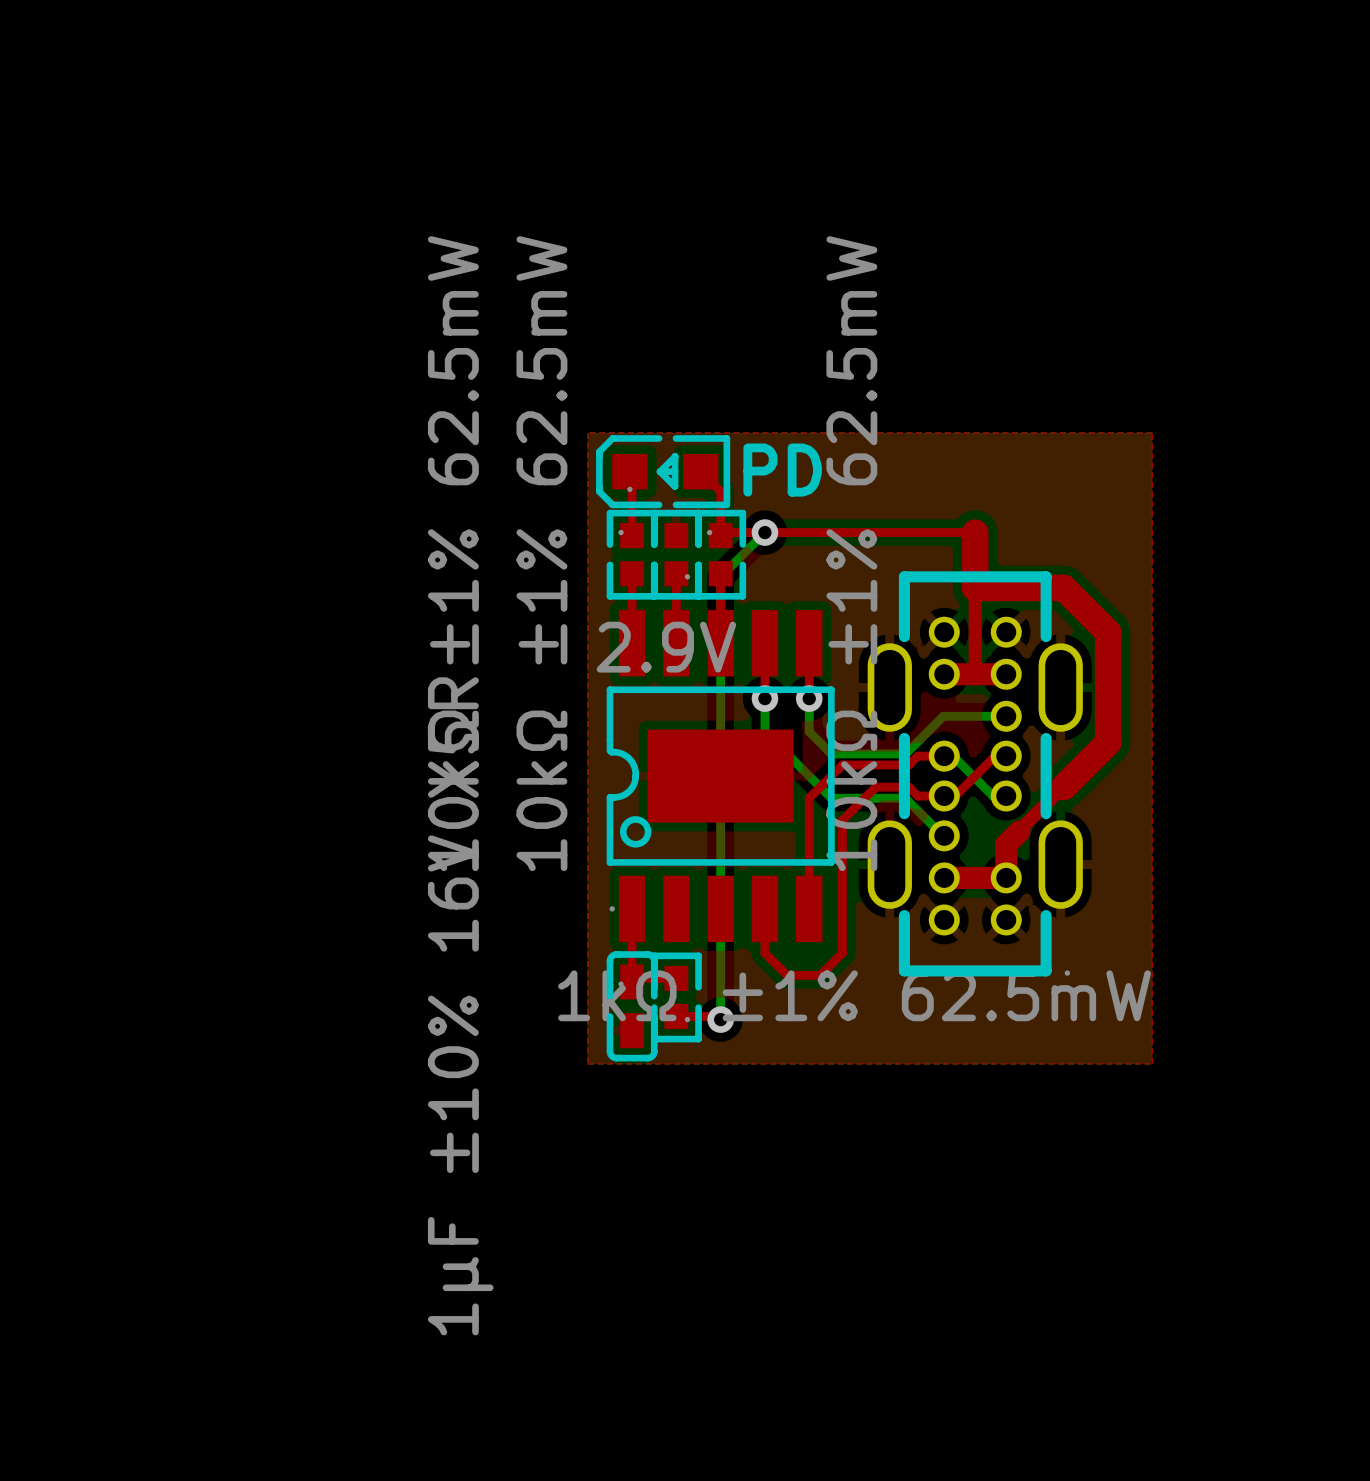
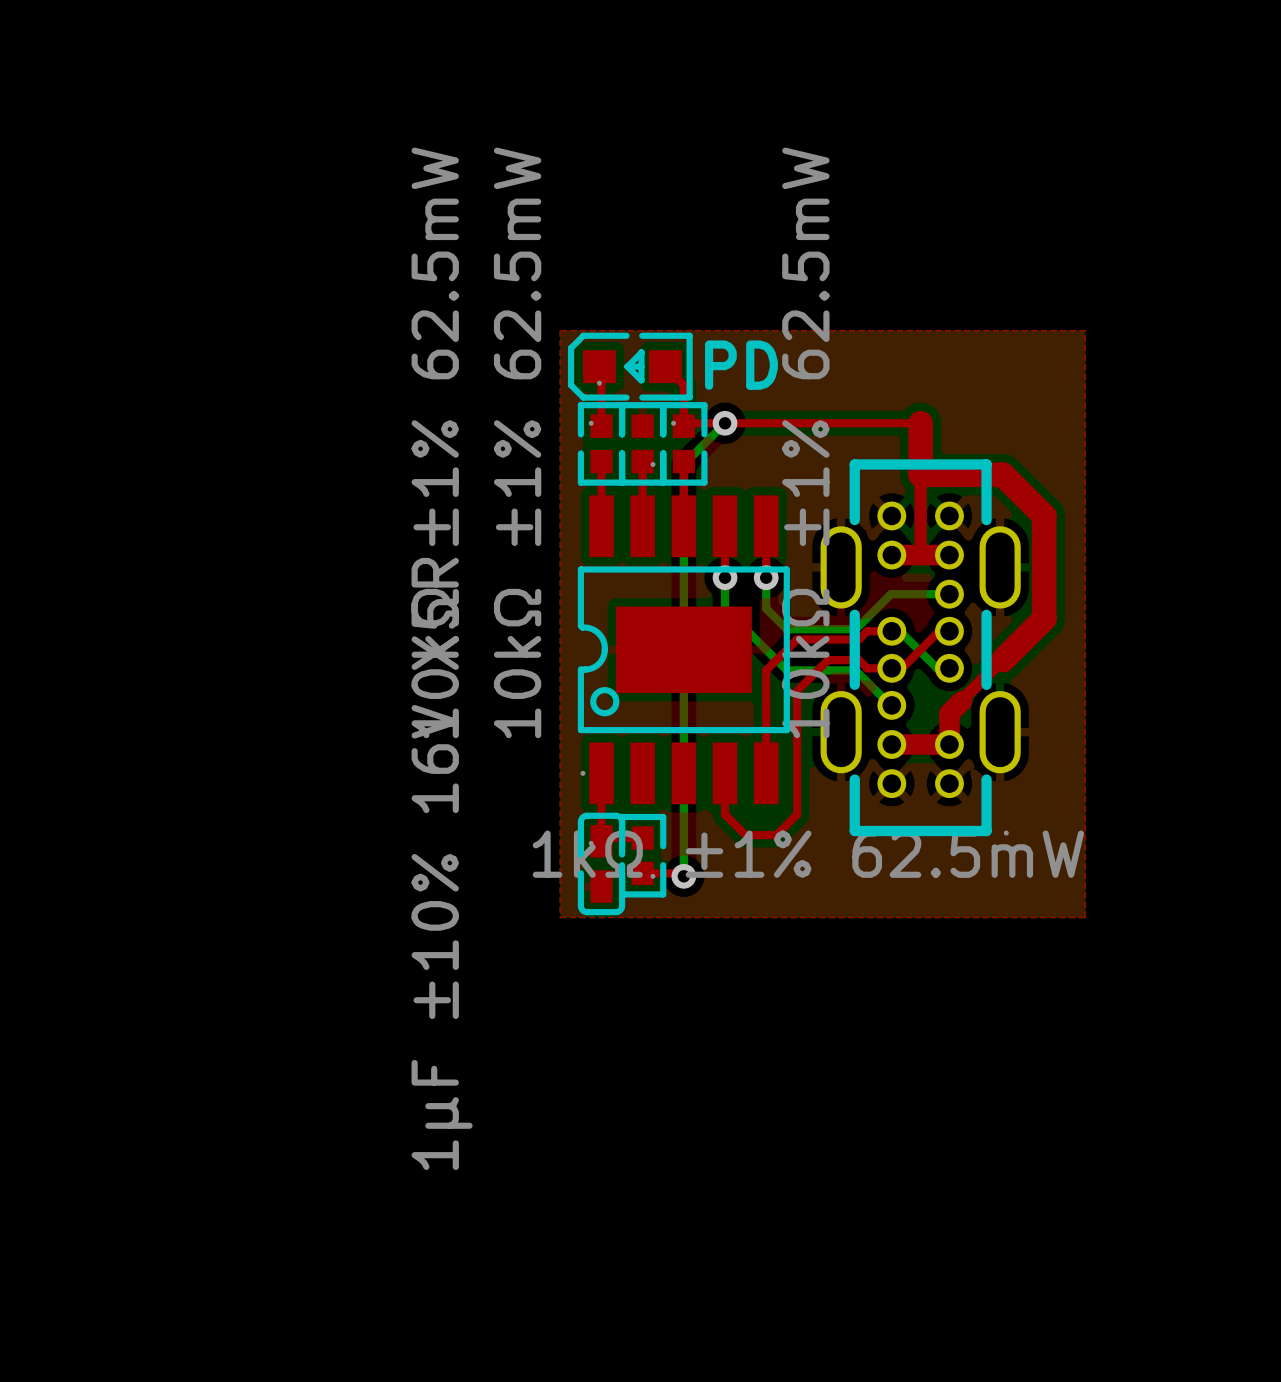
part value: 2.9V (666, 647) -> none

